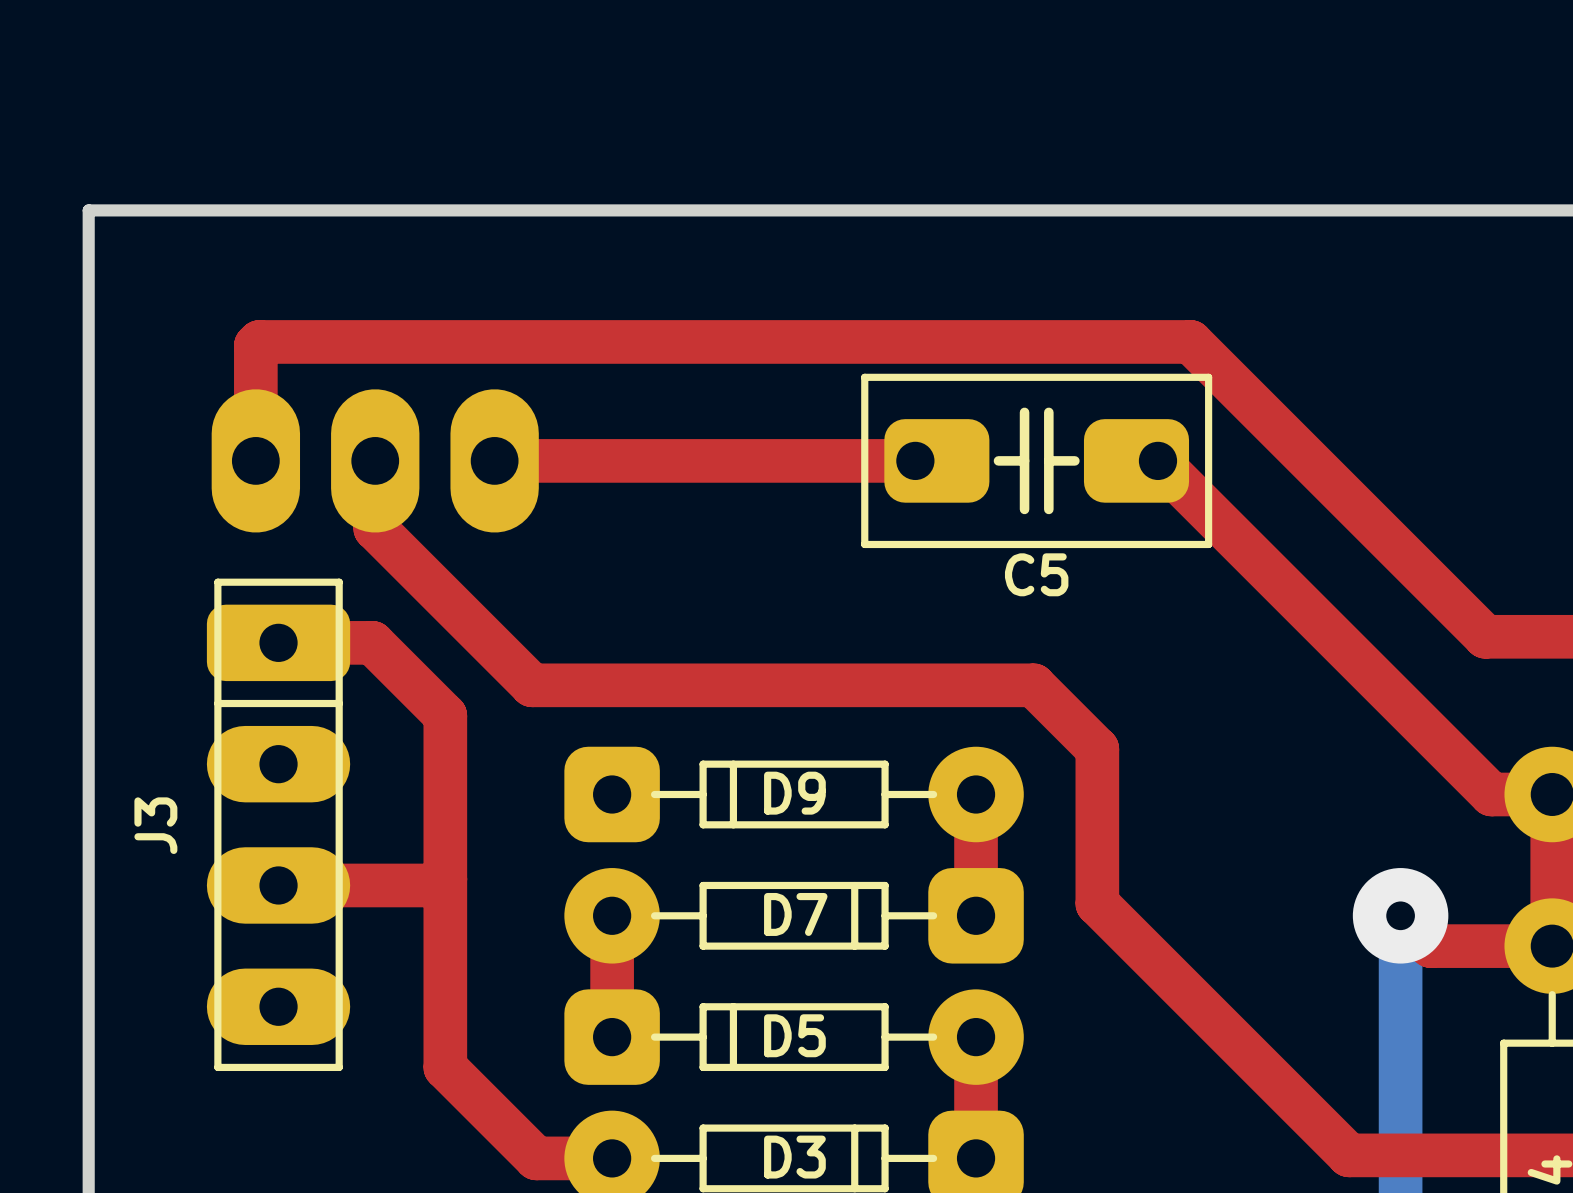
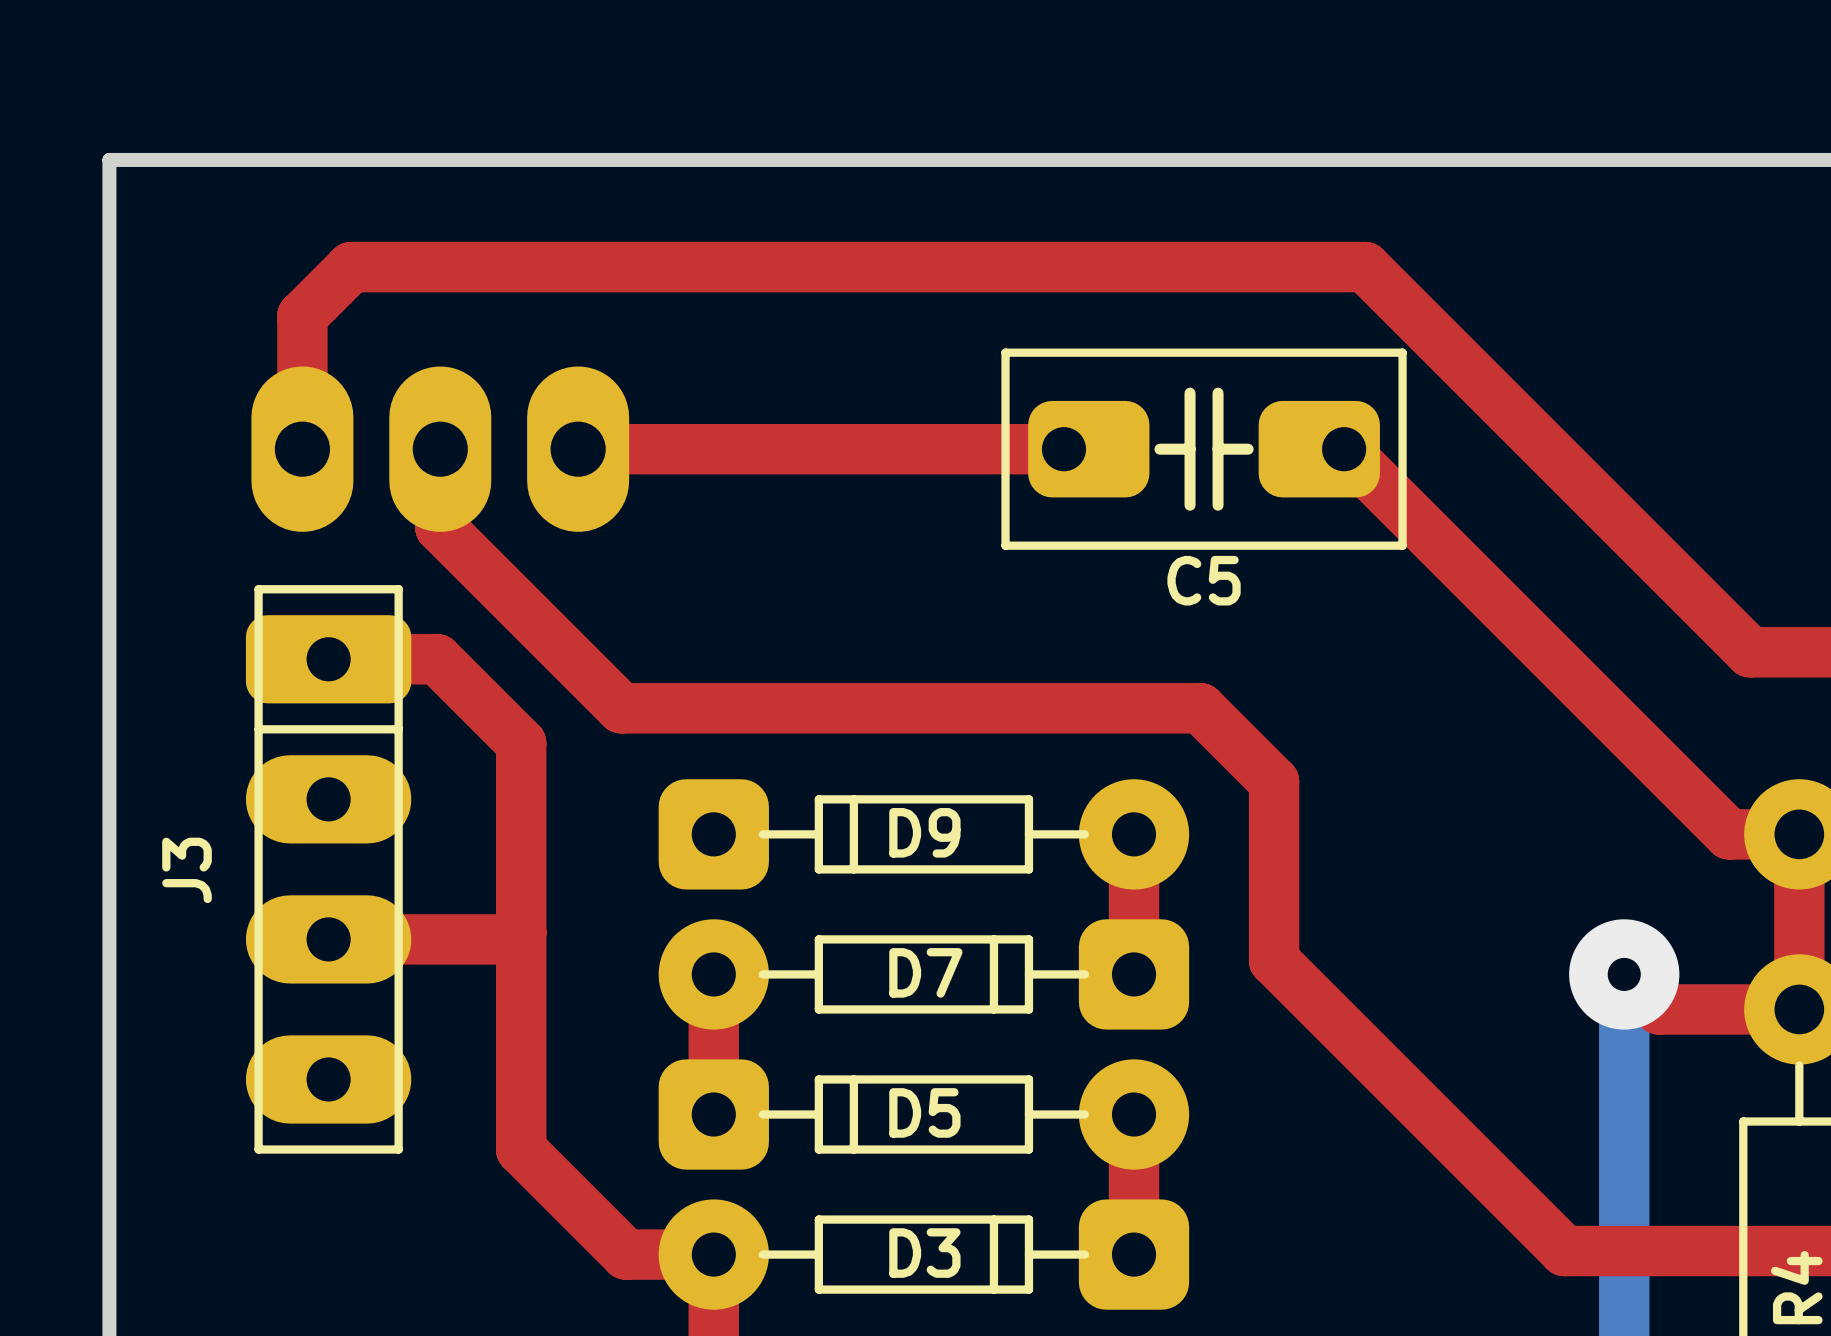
top track: (259, 341) (1190, 341) (1485, 636) (1509, 636) -> (306, 311) (351, 267) (1365, 267) (1750, 652)

